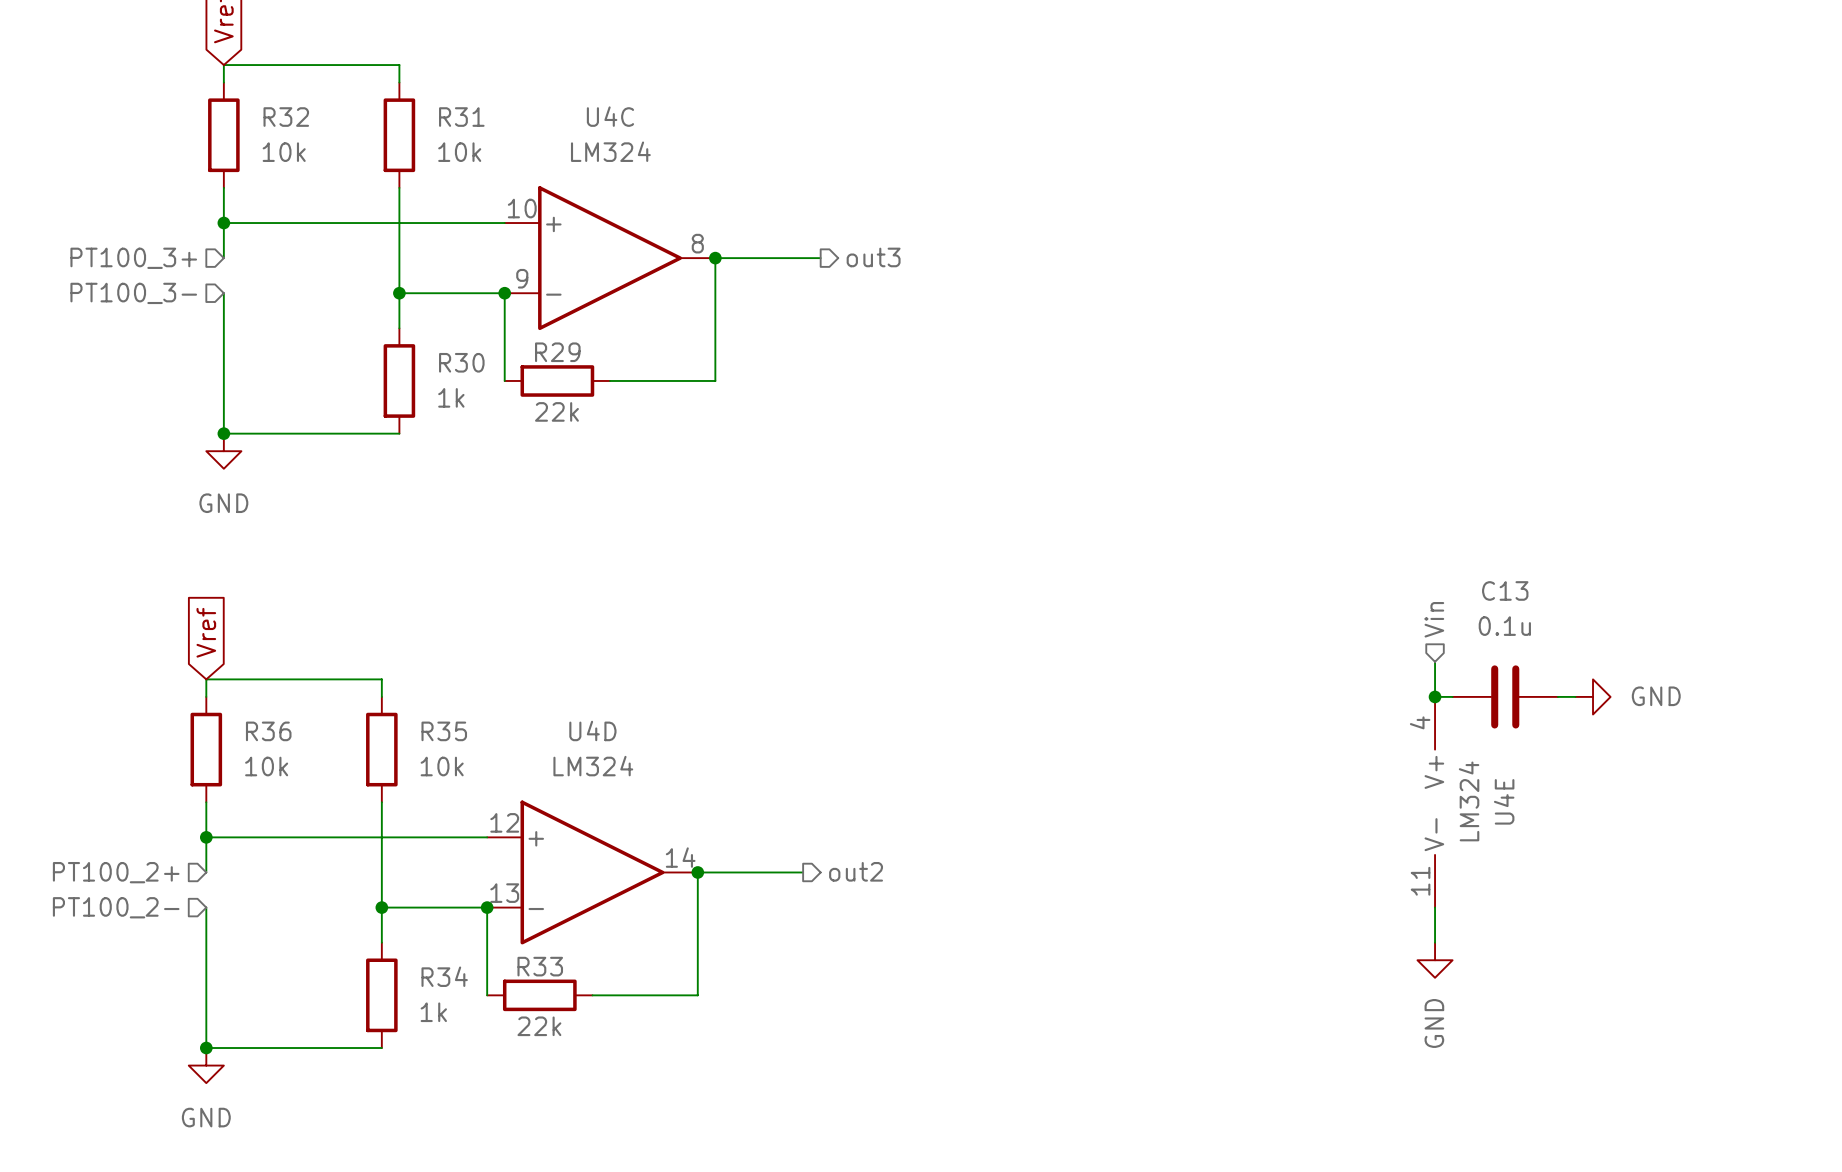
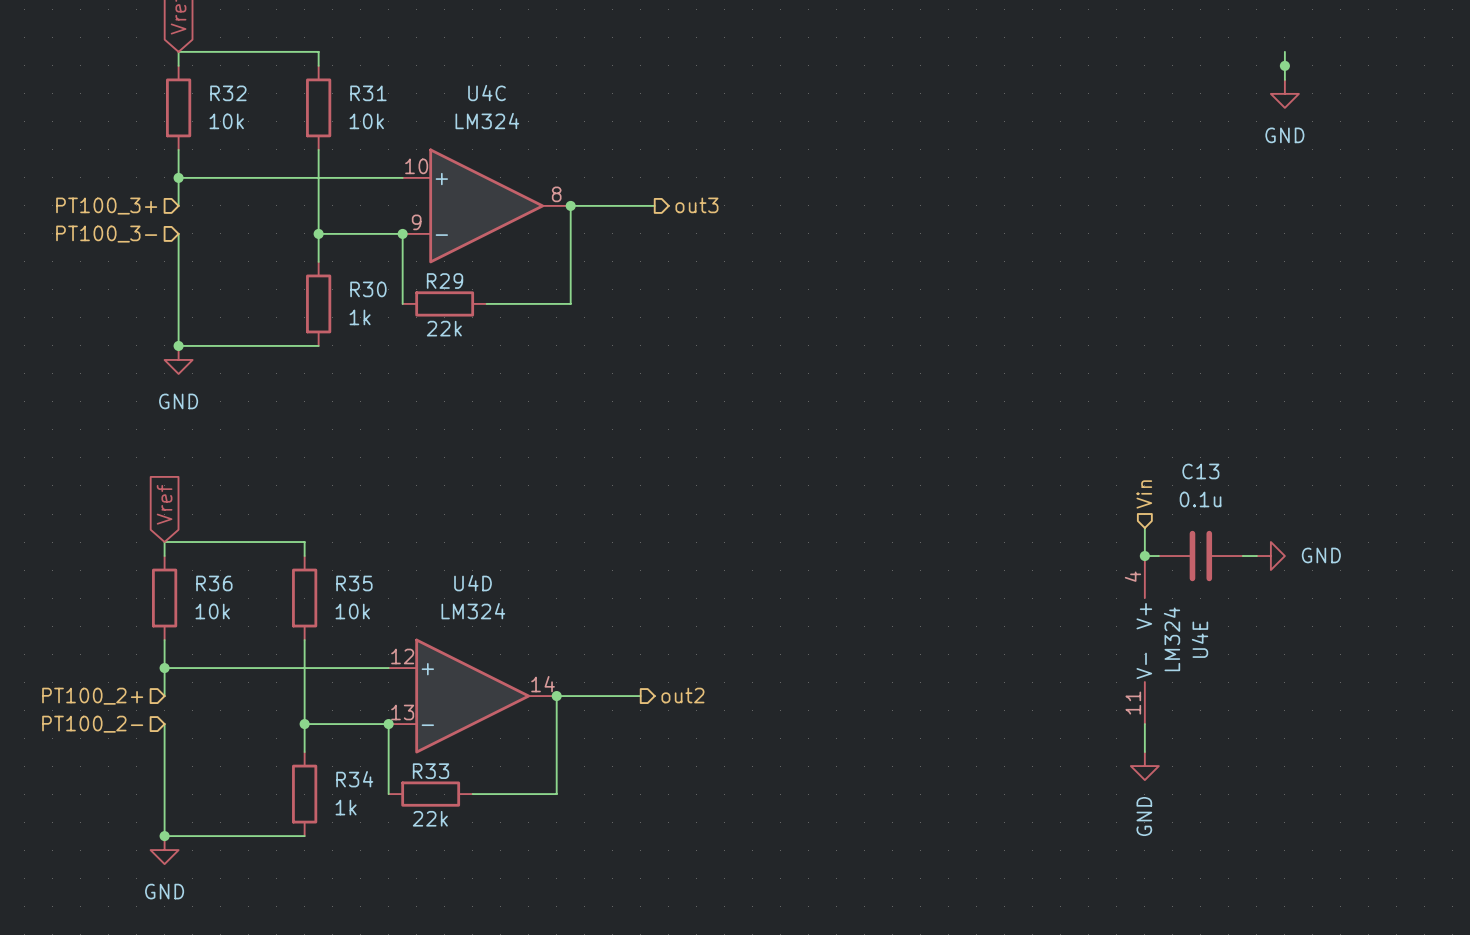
wire: none -> (1284, 51) (1284, 79)
junction: none -> (1284, 65)
power symbol: none -> GND (1284, 93)

